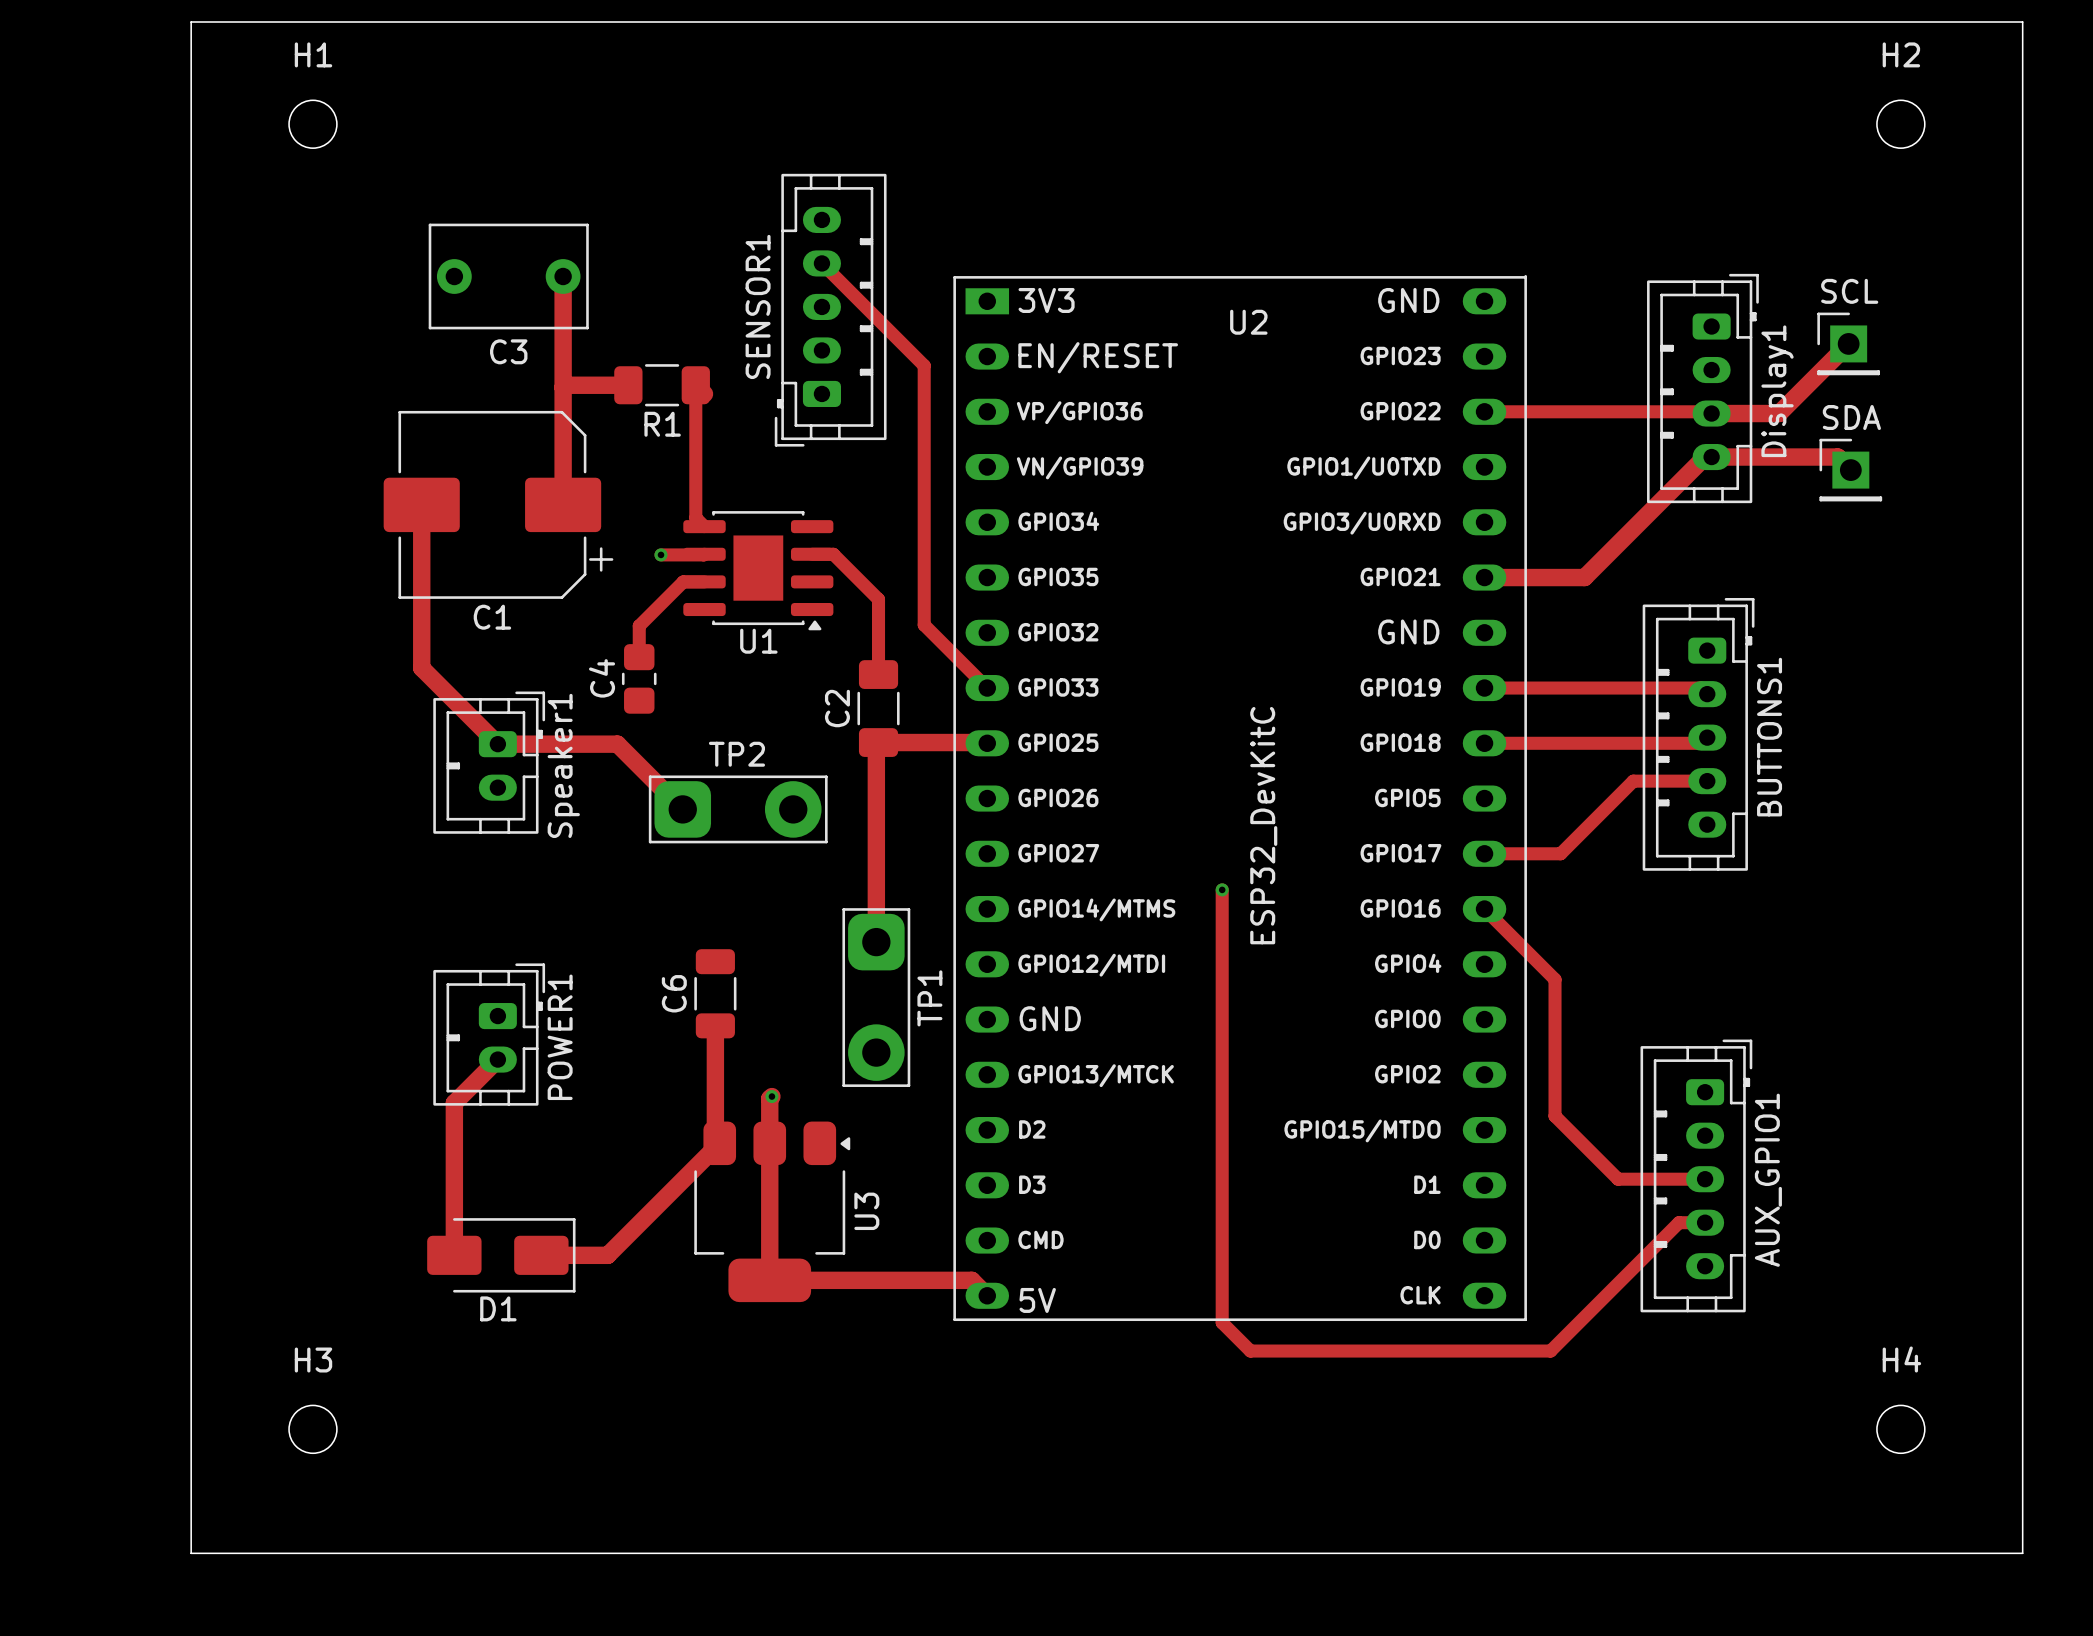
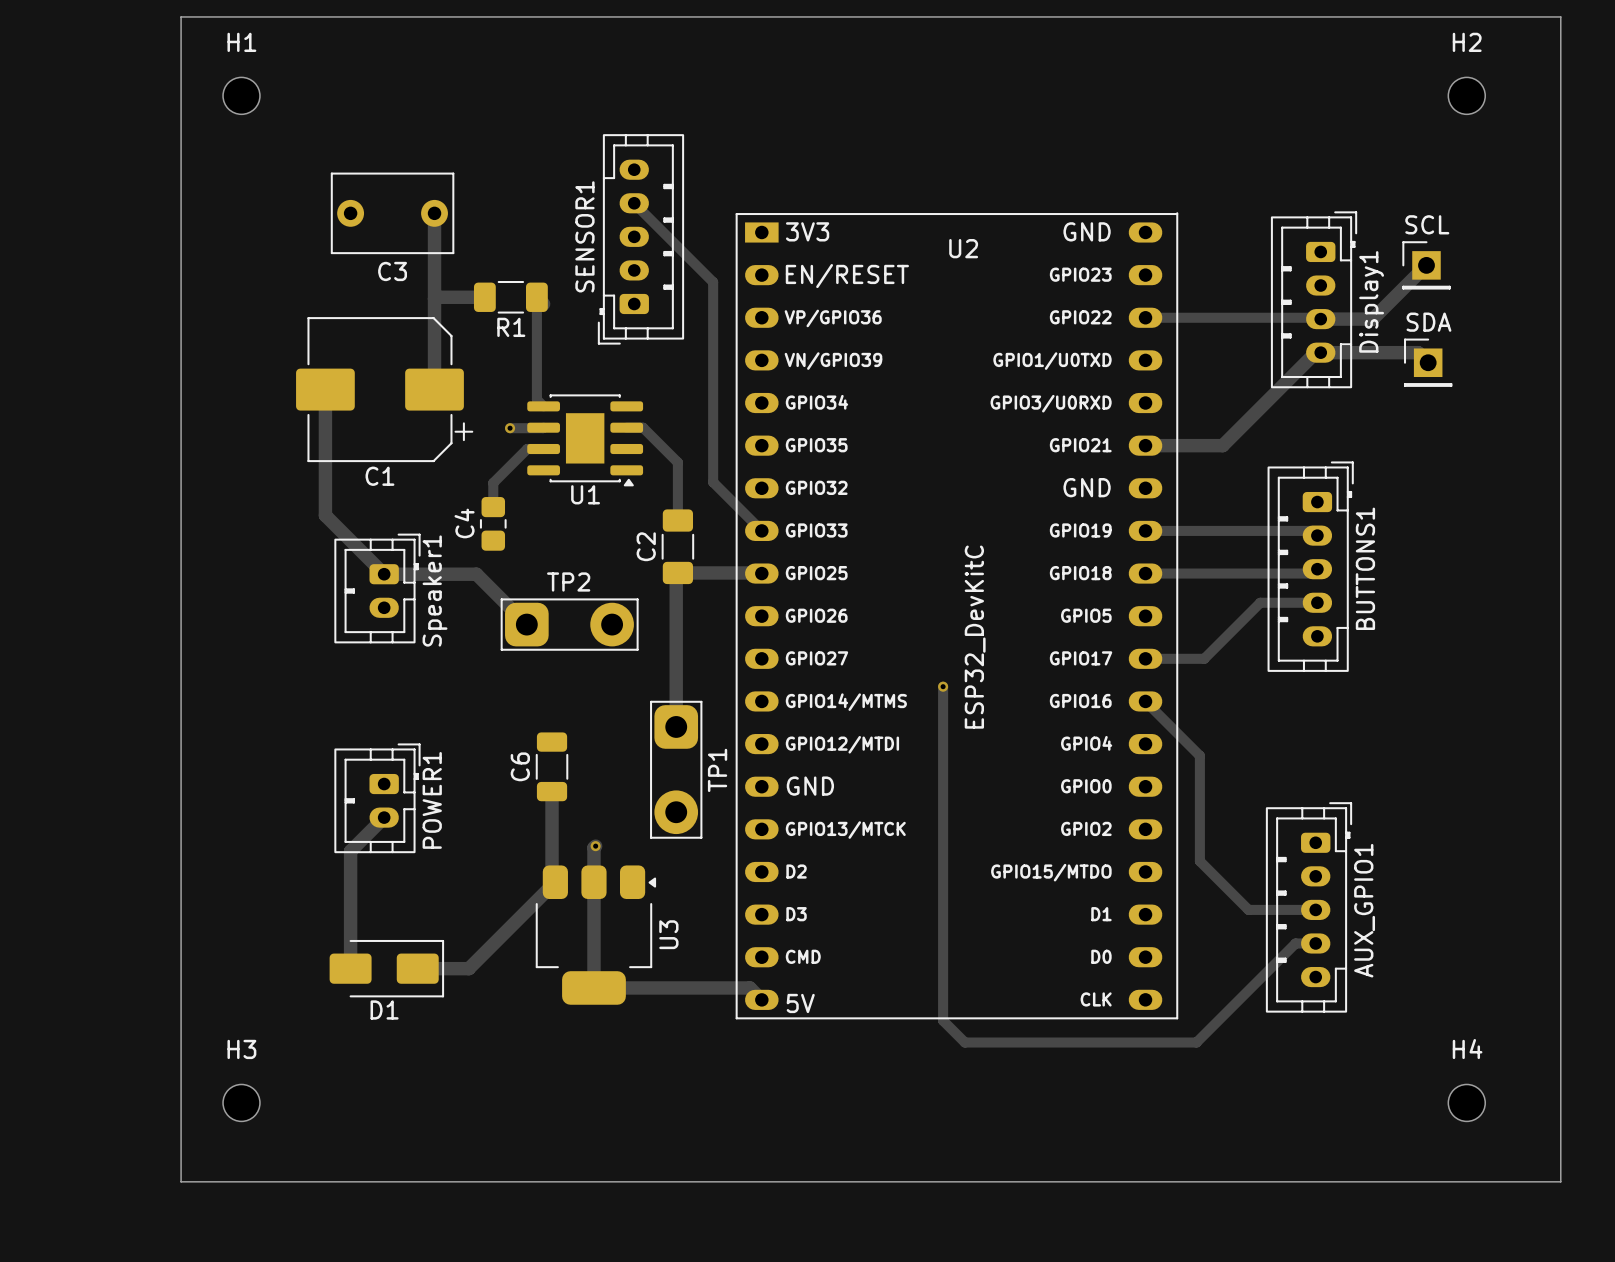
board edge: (234, 22) (191, 22) (191, 1553) (2022, 1553) (2022, 1531) -> (181, 16) (181, 1181) (1560, 1181)

